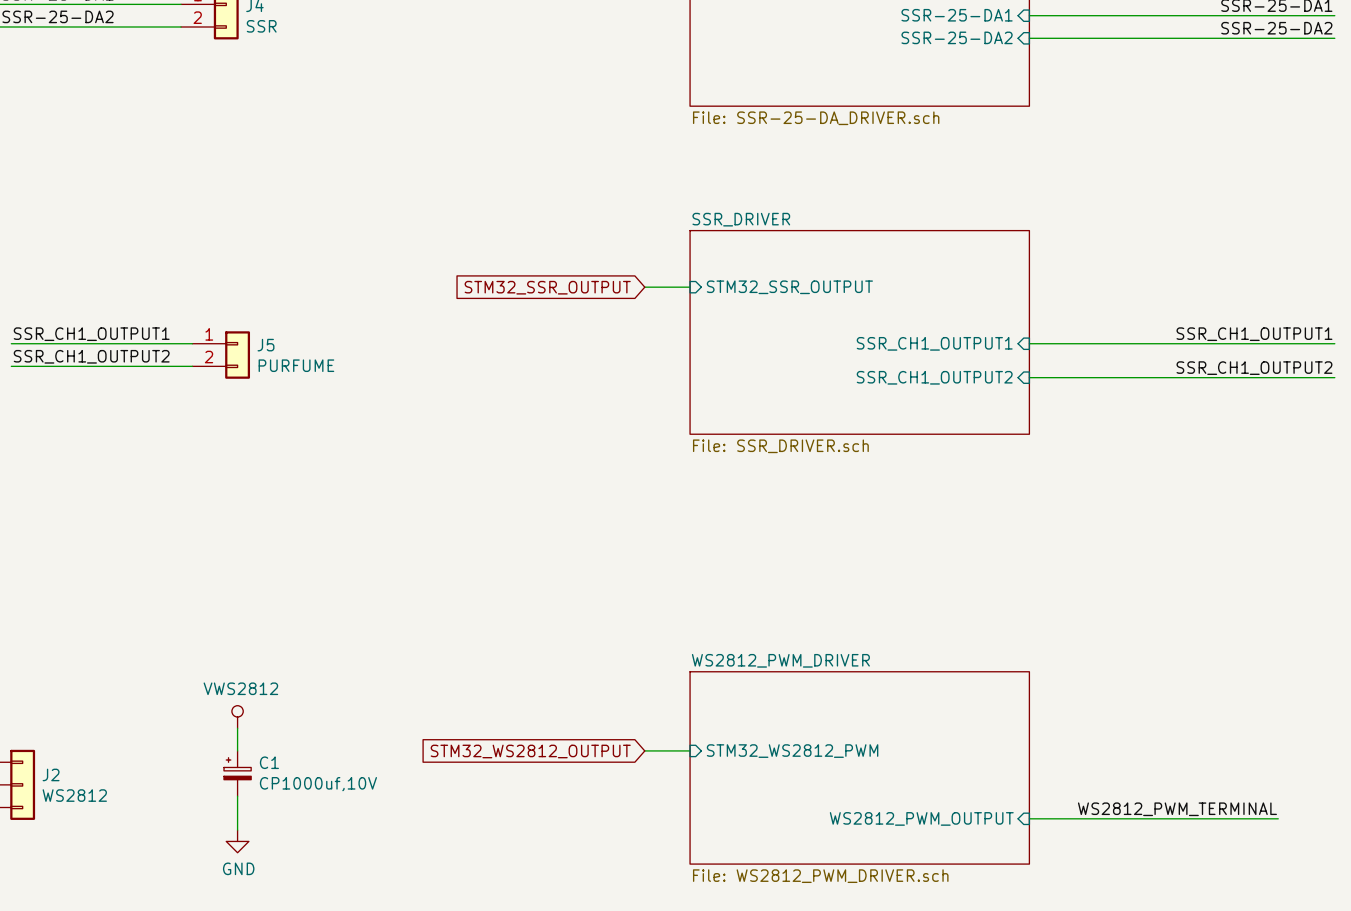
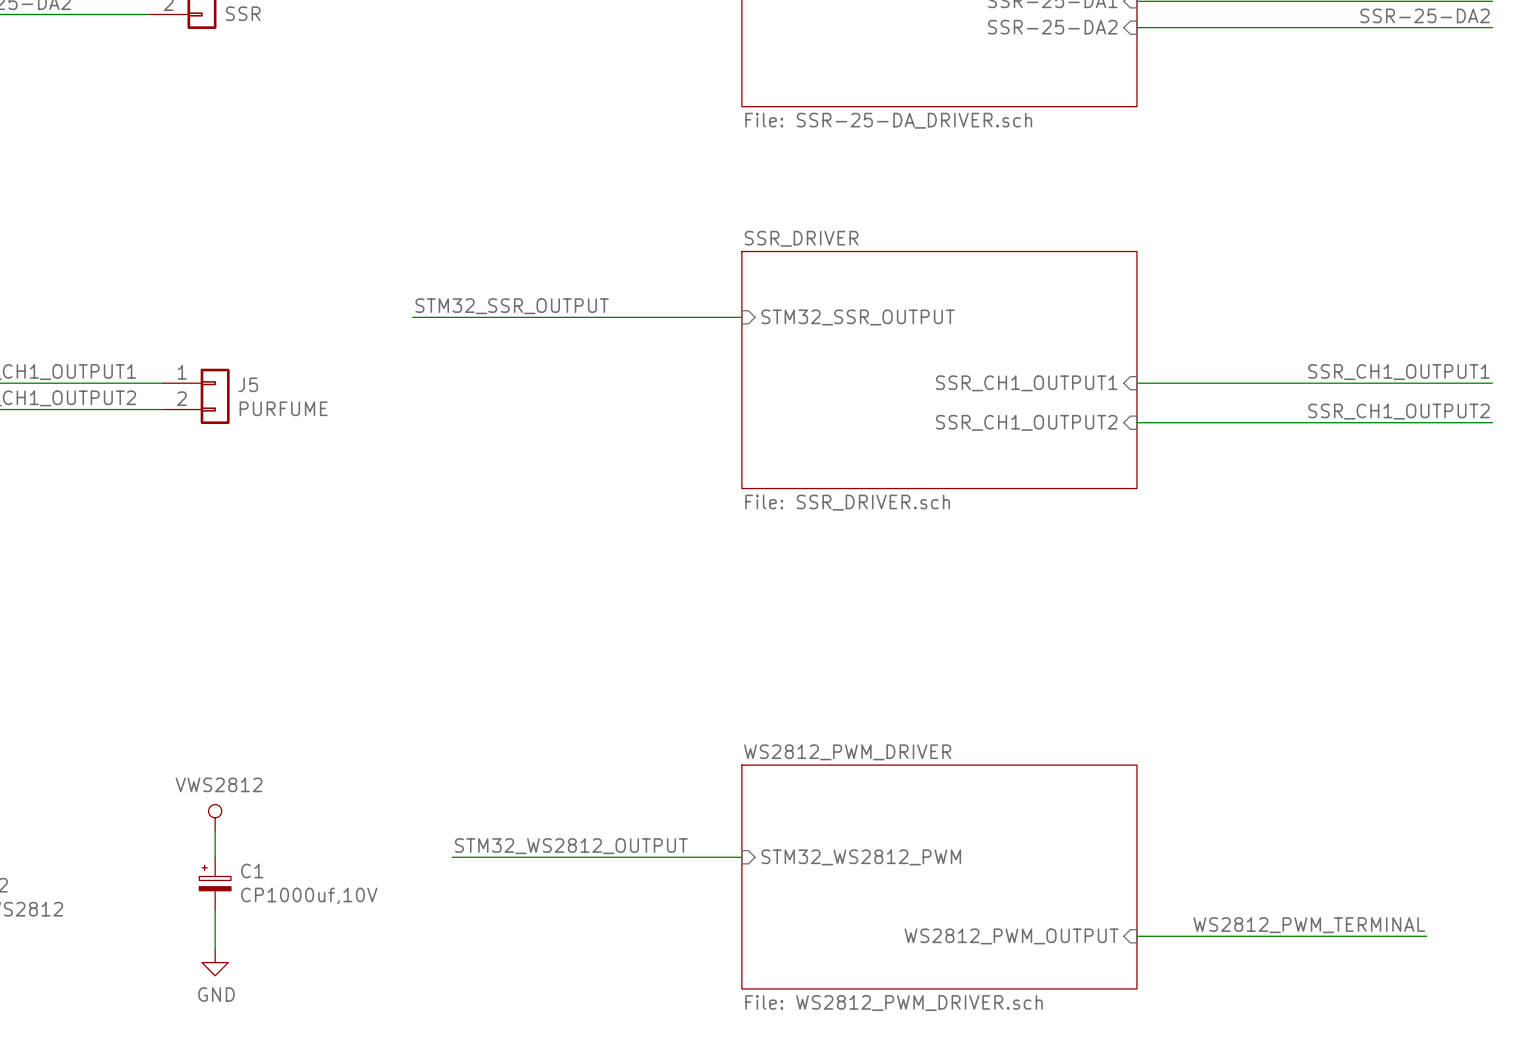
label: none -> STM32_SSR_OUTPUT (512, 306)
wire: none -> (412, 317) (689, 317)
global label: STM32_SSR_OUTPUT (547, 287) -> none
label: none -> STM32_WS2812_OUTPUT (571, 846)
wire: none -> (452, 857) (689, 857)
global label: STM32_WS2812_OUTPUT (530, 751) -> none

